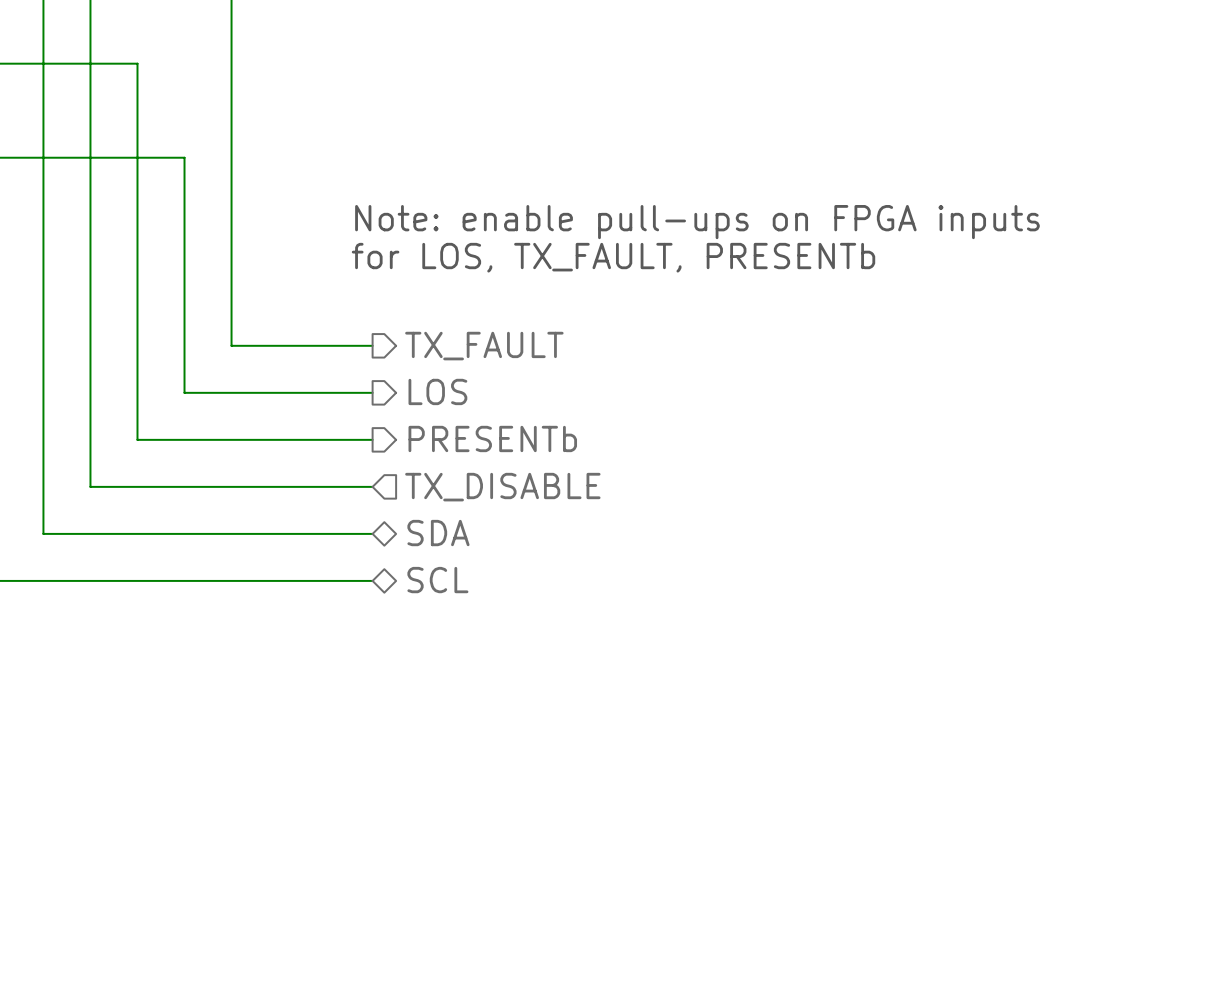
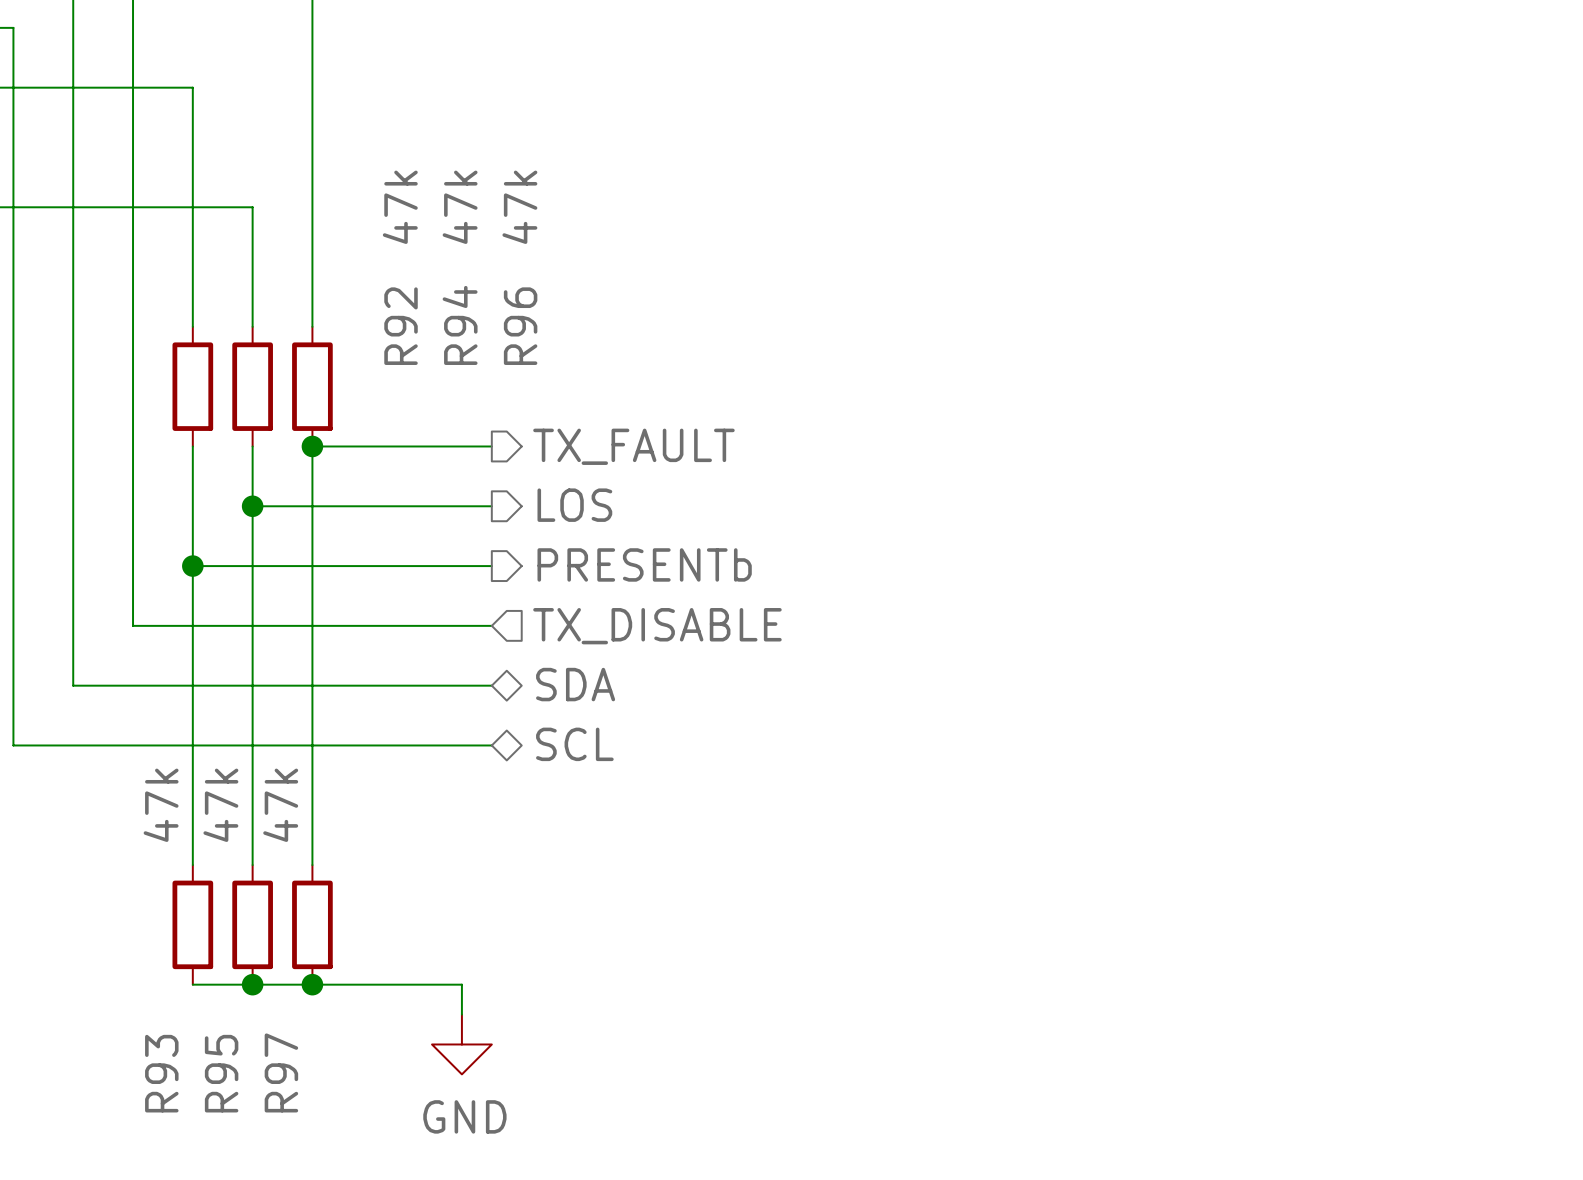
text: Note: enable pull-ups on FPGA inputs (697, 222) -> none
wire: (137, 251) (137, 345) -> none
wire: (184, 251) (184, 345) -> none
wire: (231, 251) (231, 345) -> (312, 865) (312, 446)
text: for LOS, TX_FAULT, PRESENTb (613, 257) -> none
R92: none -> 47k (192, 386)
R94: none -> 47k (252, 386)
R96: none -> 47k (312, 386)
junction: none -> (312, 446)
wire: none -> (252, 506) (252, 865)
junction: none -> (252, 506)
wire: none -> (192, 566) (192, 865)
junction: none -> (192, 566)
R93: none -> 47k (192, 924)
R95: none -> 47k (252, 924)
R97: none -> 47k (312, 924)
wire: none -> (192, 984) (461, 984) (461, 1014)
junction: none -> (252, 984)
junction: none -> (312, 984)
power symbol: none -> GND (461, 1044)

